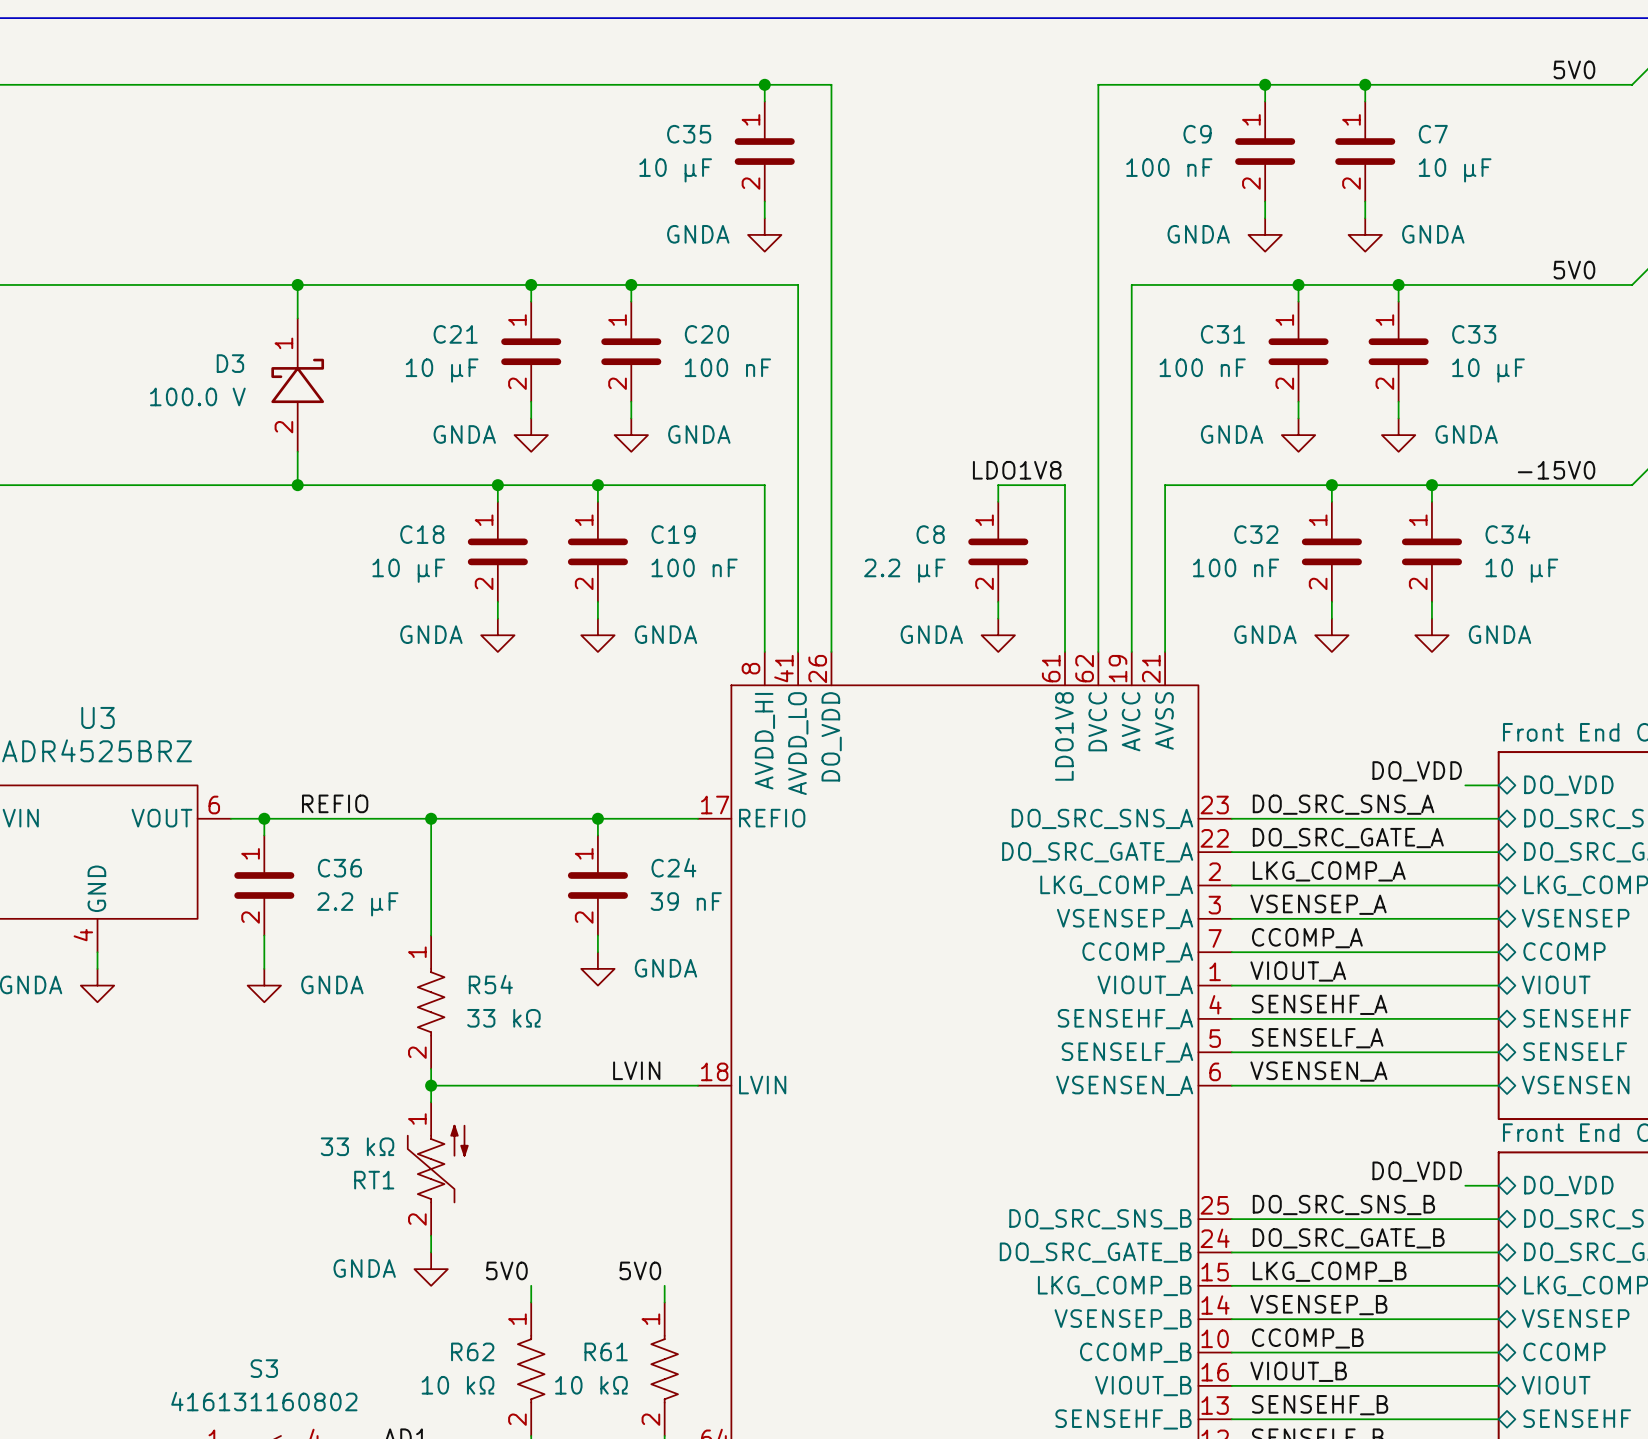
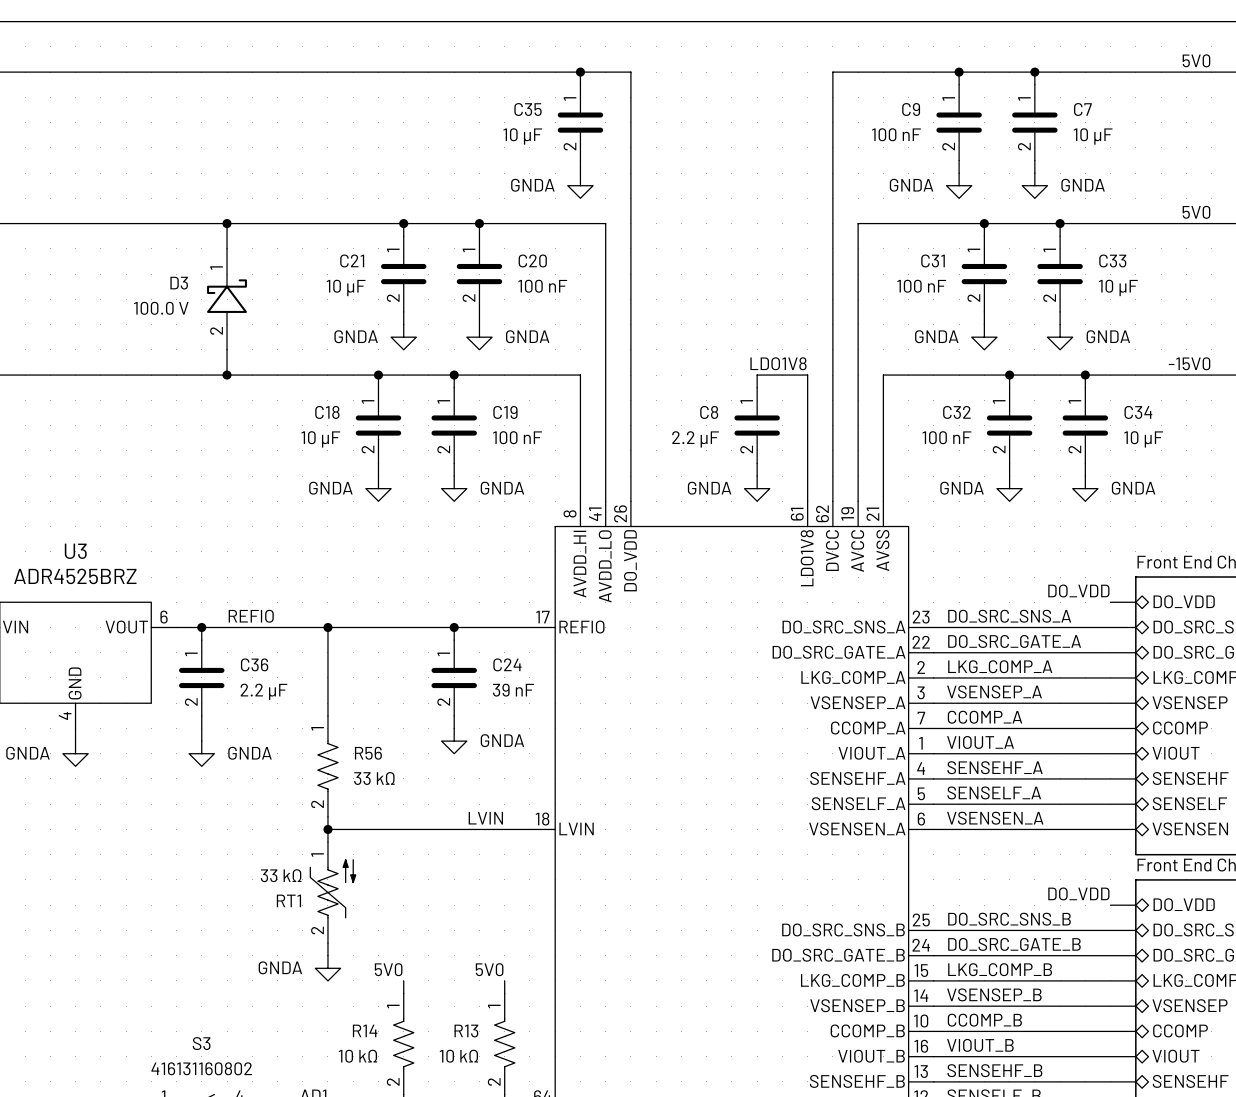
R54 name: R54 (490, 984) -> R56 (368, 753)
R62 name: R62 (472, 1351) -> R14 (365, 1030)
R61 name: R61 (606, 1351) -> R13 (466, 1031)

